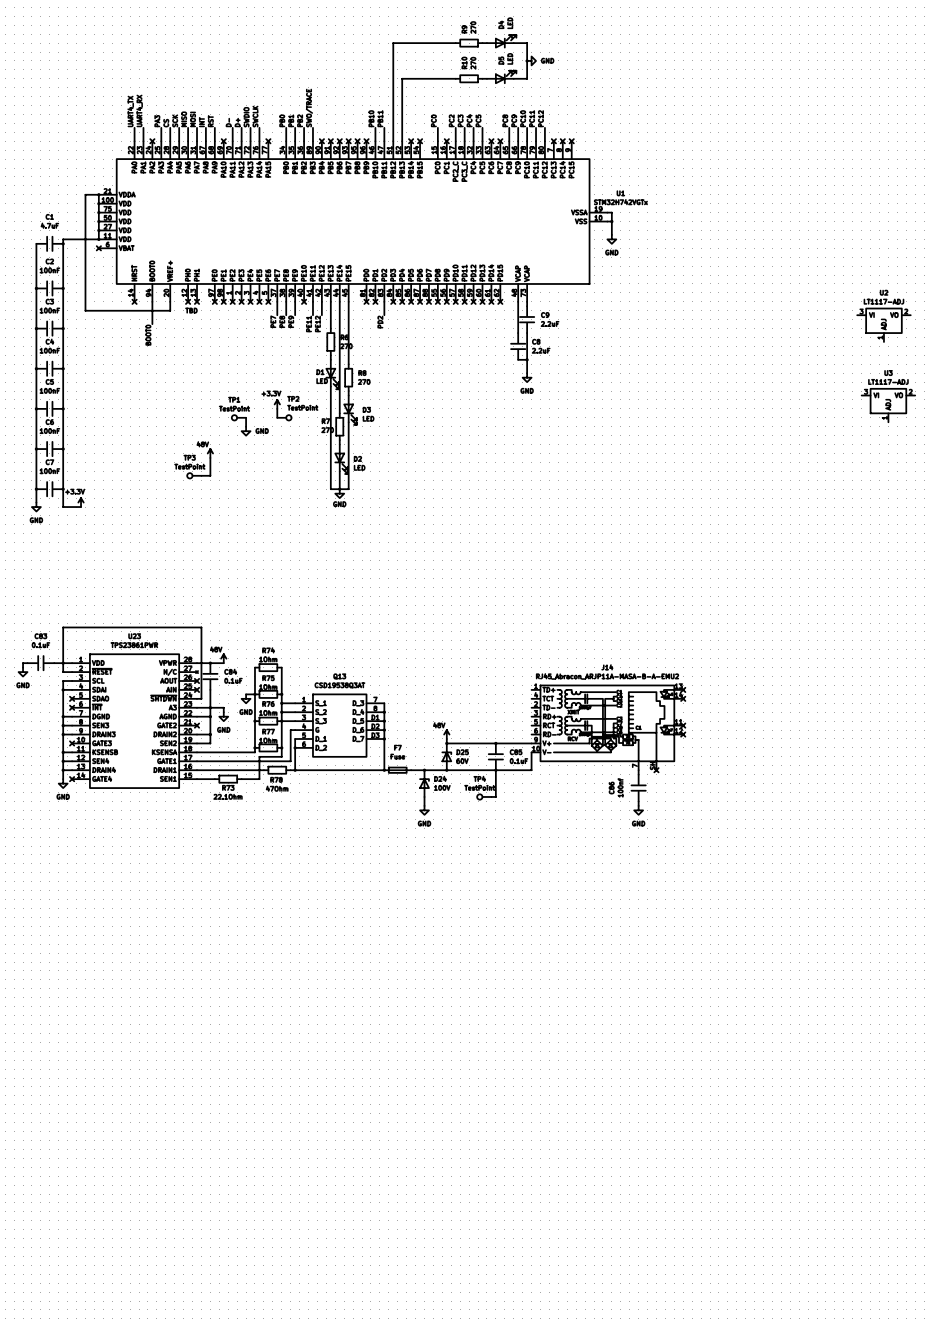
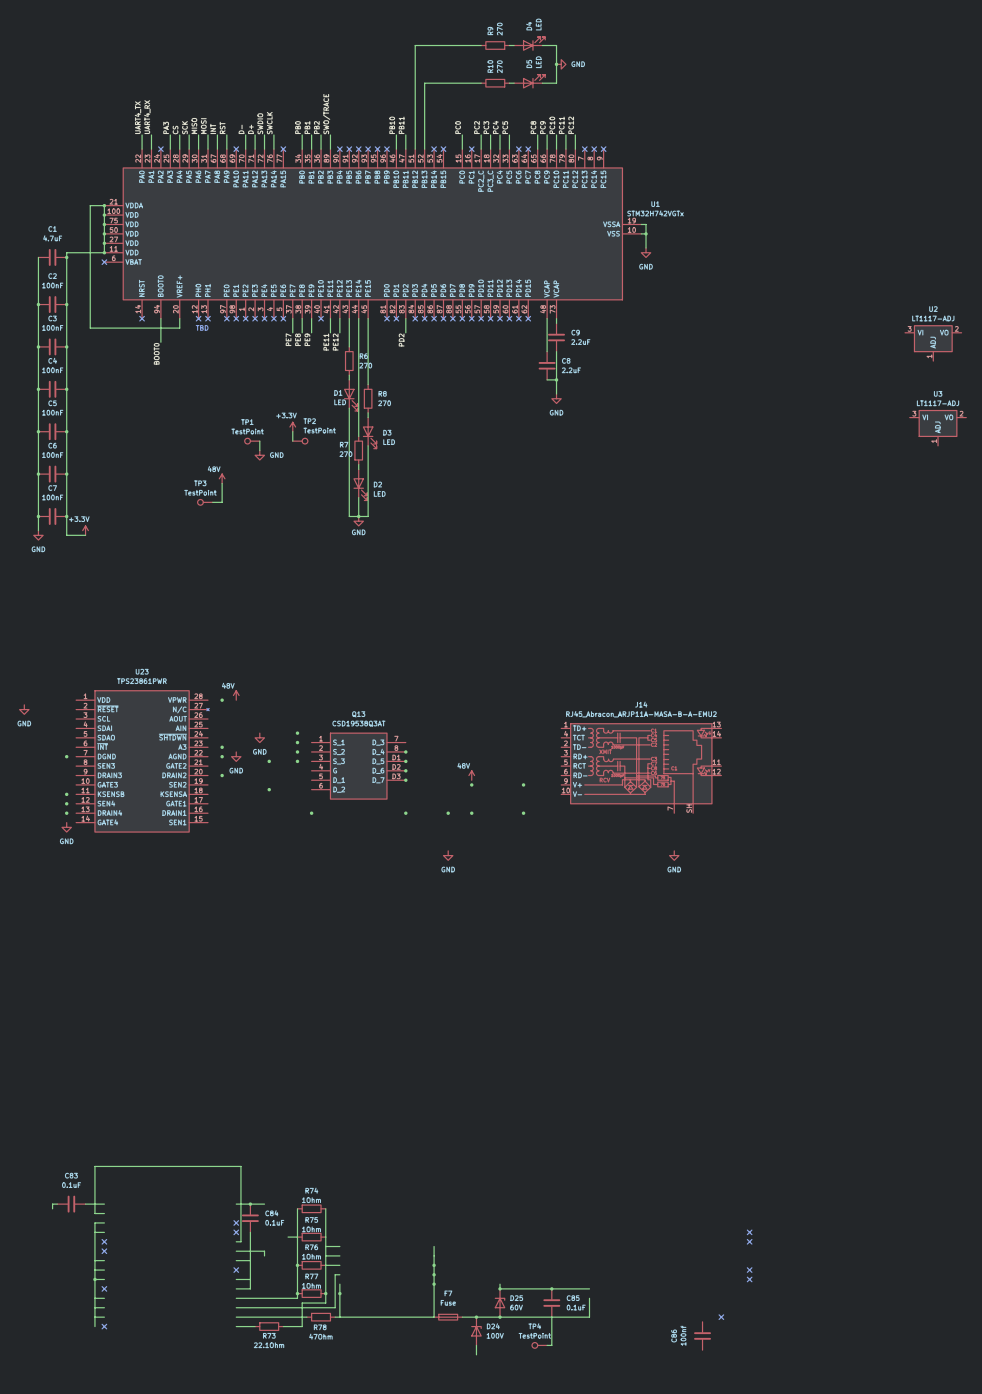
wire: (27, 663) (23, 663) (23, 667) -> none
part position: (40, 663) -> (71, 1204)
wire: (54, 663) (72, 663) -> none
wire: (197, 663) (223, 663) -> none
wire: (254, 667) (254, 752) (197, 752) -> none
part position: (268, 667) -> (311, 1208)
wire: (281, 667) (281, 756) (259, 756) (259, 779) (241, 779) -> none
wire: (72, 672) (63, 672) (63, 627) (201, 627) (201, 698) (197, 698) -> none
part position: (210, 676) -> (250, 1218)
wire: (72, 681) (63, 681) (63, 779) -> none
no-connect mark: (197, 681) -> none
wire: (63, 689) (72, 689) -> none
no-connect mark: (197, 689) -> none
wire: (210, 689) (210, 743) (197, 743) -> none
no-connect mark: (683, 689) -> none
wire: (246, 694) (254, 694) -> none
part position: (268, 694) -> (311, 1237)
no-connect mark: (72, 698) -> none
no-connect mark: (683, 698) -> none
wire: (281, 703) (295, 703) -> none
wire: (384, 703) (384, 770) (290, 770) -> none
no-connect mark: (72, 707) -> none
wire: (197, 707) (223, 707) (223, 712) -> none
wire: (281, 712) (295, 712) -> none
wire: (63, 716) (72, 716) -> none
wire: (197, 716) (210, 716) -> none
part position: (268, 721) -> (311, 1265)
wire: (281, 721) (295, 721) -> none
wire: (63, 725) (72, 725) -> none
no-connect mark: (197, 725) -> none
no-connect mark: (683, 725) -> none
wire: (295, 730) (290, 730) (290, 761) (197, 761) -> none
wire: (63, 734) (72, 734) -> none
wire: (197, 734) (210, 734) -> none
no-connect mark: (683, 734) -> none
wire: (295, 738) (295, 770) -> none
wire: (446, 738) (446, 743) (531, 743) -> none
no-connect mark: (72, 743) -> none
part position: (268, 747) -> (311, 1293)
wire: (63, 752) (72, 752) -> none
wire: (531, 752) (531, 770) (411, 770) -> none
part position: (446, 756) -> (500, 1303)
part position: (495, 756) -> (551, 1303)
wire: (63, 761) (72, 761) -> none
wire: (63, 770) (72, 770) -> none
wire: (197, 770) (263, 770) -> none
part position: (277, 770) -> (321, 1317)
part position: (397, 770) -> (448, 1317)
wire: (495, 770) (495, 796) (491, 796) -> none
wire: (638, 770) (638, 774) -> none
no-connect mark: (656, 770) -> none
no-connect mark: (72, 779) -> none
wire: (197, 779) (214, 779) -> none
part position: (228, 779) -> (269, 1326)
part position: (424, 783) -> (476, 1331)
part position: (638, 788) -> (702, 1335)
wire: (424, 796) (424, 805) -> none
part position: (484, 796) -> (539, 1345)
wire: (638, 801) (638, 805) -> none
wire: none -> (57, 1204) (52, 1204) (52, 1208)
wire: none -> (85, 1204) (104, 1204)
wire: none -> (236, 1204) (264, 1204)
junction: none -> (250, 1204)
wire: none -> (297, 1208) (297, 1298) (236, 1298)
wire: none -> (325, 1208) (325, 1303) (302, 1303) (302, 1326) (283, 1326)
wire: none -> (104, 1213) (94, 1213) (94, 1166) (240, 1166) (240, 1241) (236, 1241)
wire: none -> (104, 1222) (94, 1222) (94, 1326)
no-connect mark: none -> (236, 1222)
wire: none -> (94, 1232) (104, 1232)
no-connect mark: none -> (236, 1232)
wire: none -> (250, 1232) (250, 1288) (236, 1288)
no-connect mark: none -> (749, 1232)
wire: none -> (288, 1237) (297, 1237)
no-connect mark: none -> (104, 1241)
no-connect mark: none -> (749, 1241)
wire: none -> (325, 1246) (339, 1246)
wire: none -> (434, 1246) (434, 1317) (335, 1317)
no-connect mark: none -> (104, 1251)
wire: none -> (236, 1251) (264, 1251) (264, 1255)
wire: none -> (325, 1255) (339, 1255)
wire: none -> (94, 1260) (104, 1260)
wire: none -> (236, 1260) (250, 1260)
junction: none -> (297, 1265)
wire: none -> (325, 1265) (339, 1265)
junction: none -> (434, 1265)
wire: none -> (94, 1270) (104, 1270)
no-connect mark: none -> (236, 1270)
no-connect mark: none -> (749, 1270)
wire: none -> (339, 1274) (335, 1274) (335, 1307) (236, 1307)
junction: none -> (434, 1274)
wire: none -> (94, 1279) (104, 1279)
junction: none -> (94, 1279)
wire: none -> (236, 1279) (250, 1279)
no-connect mark: none -> (749, 1279)
wire: none -> (339, 1284) (339, 1317)
junction: none -> (434, 1284)
wire: none -> (500, 1284) (500, 1288) (589, 1288)
no-connect mark: none -> (104, 1288)
junction: none -> (500, 1288)
junction: none -> (551, 1288)
junction: none -> (297, 1293)
junction: none -> (325, 1293)
junction: none -> (339, 1293)
wire: none -> (94, 1298) (104, 1298)
wire: none -> (589, 1298) (589, 1317) (462, 1317)
wire: none -> (94, 1307) (104, 1307)
wire: none -> (94, 1317) (104, 1317)
wire: none -> (236, 1317) (306, 1317)
junction: none -> (476, 1317)
junction: none -> (500, 1317)
wire: none -> (551, 1317) (551, 1345) (547, 1345)
no-connect mark: none -> (721, 1317)
no-connect mark: none -> (104, 1326)
wire: none -> (236, 1326) (255, 1326)
wire: none -> (476, 1345) (476, 1354)

